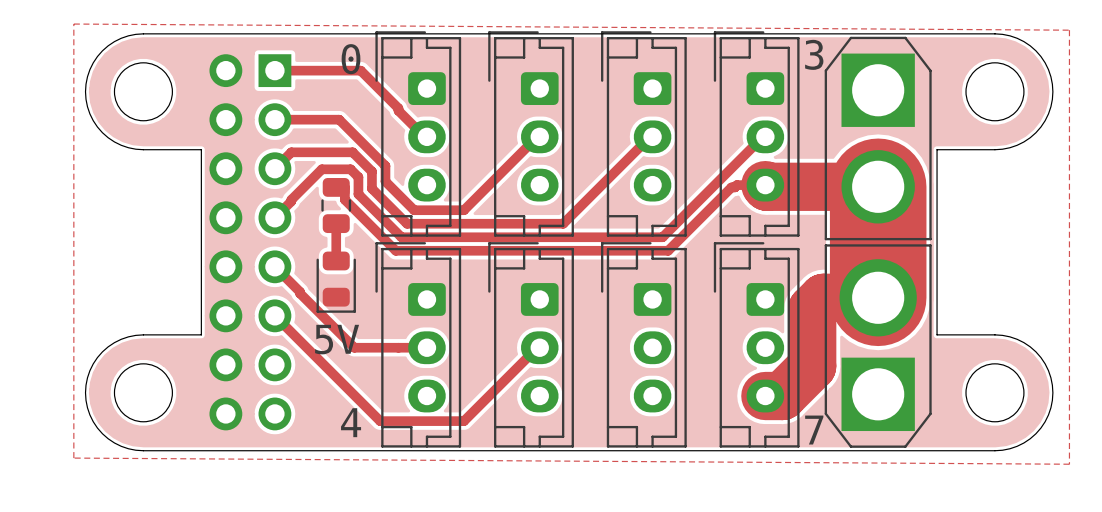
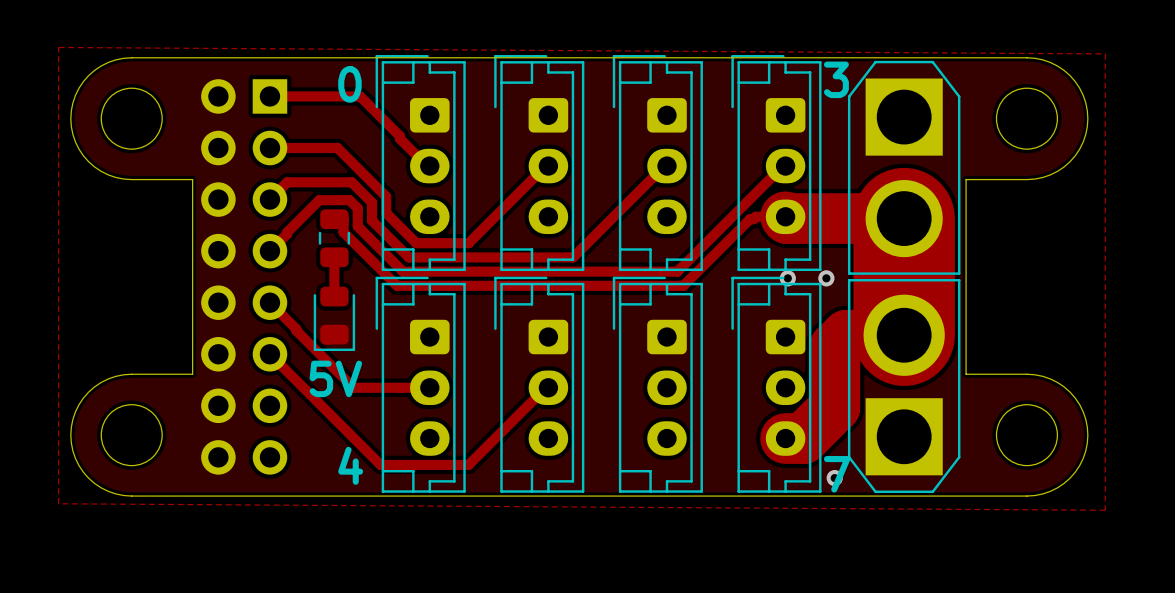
via: none -> (787, 278)
via: none -> (826, 278)
via: none -> (834, 478)

